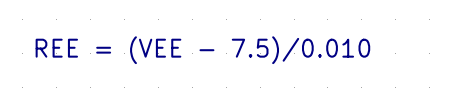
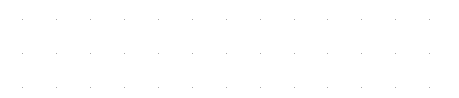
text: REE = (VEE - 7.5)/0.010 (202, 50) -> none

